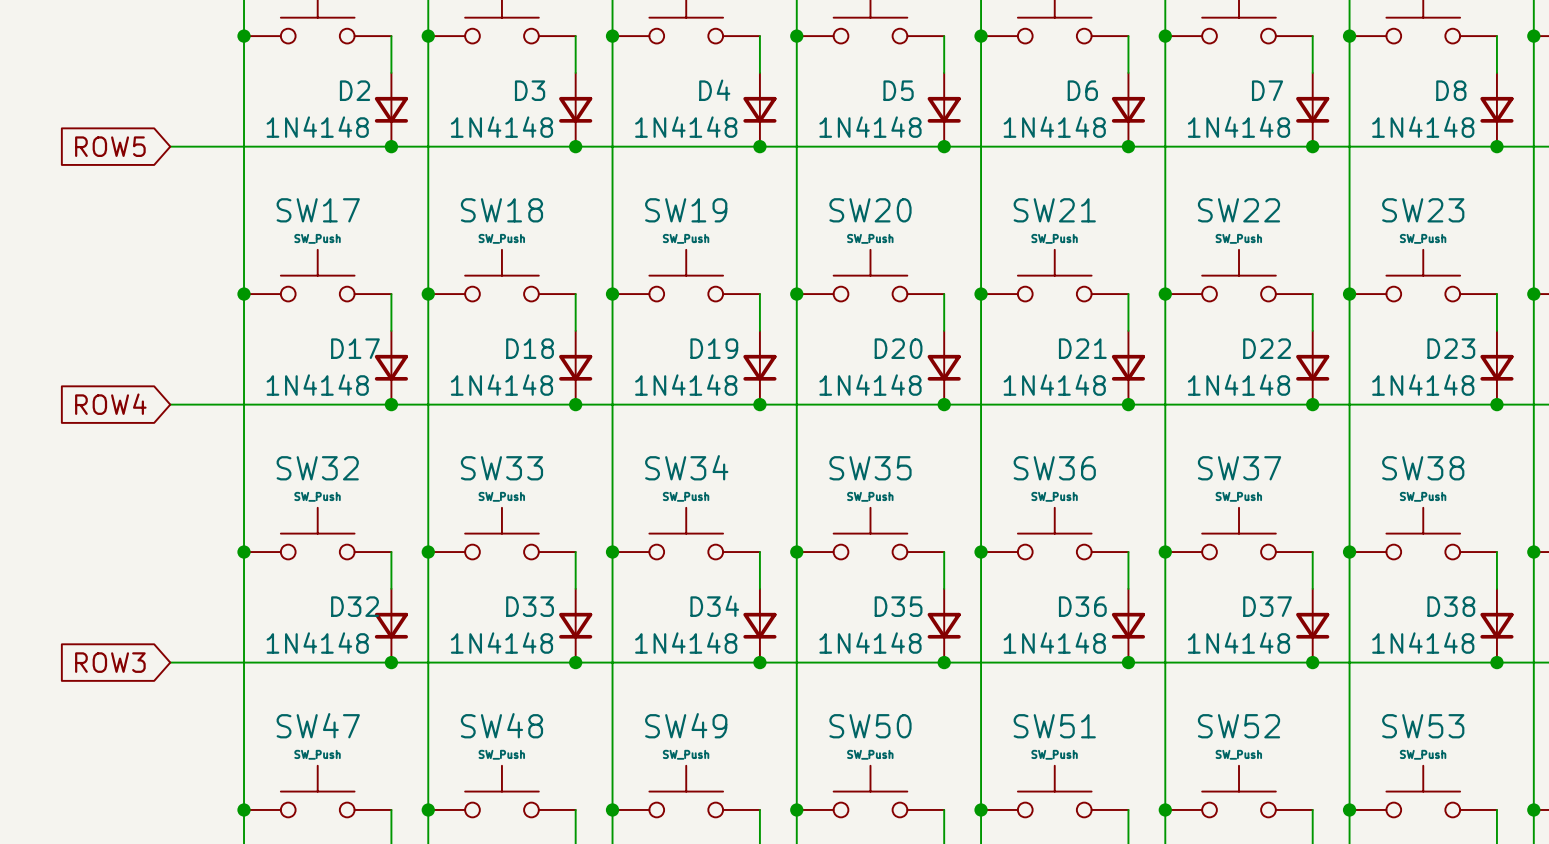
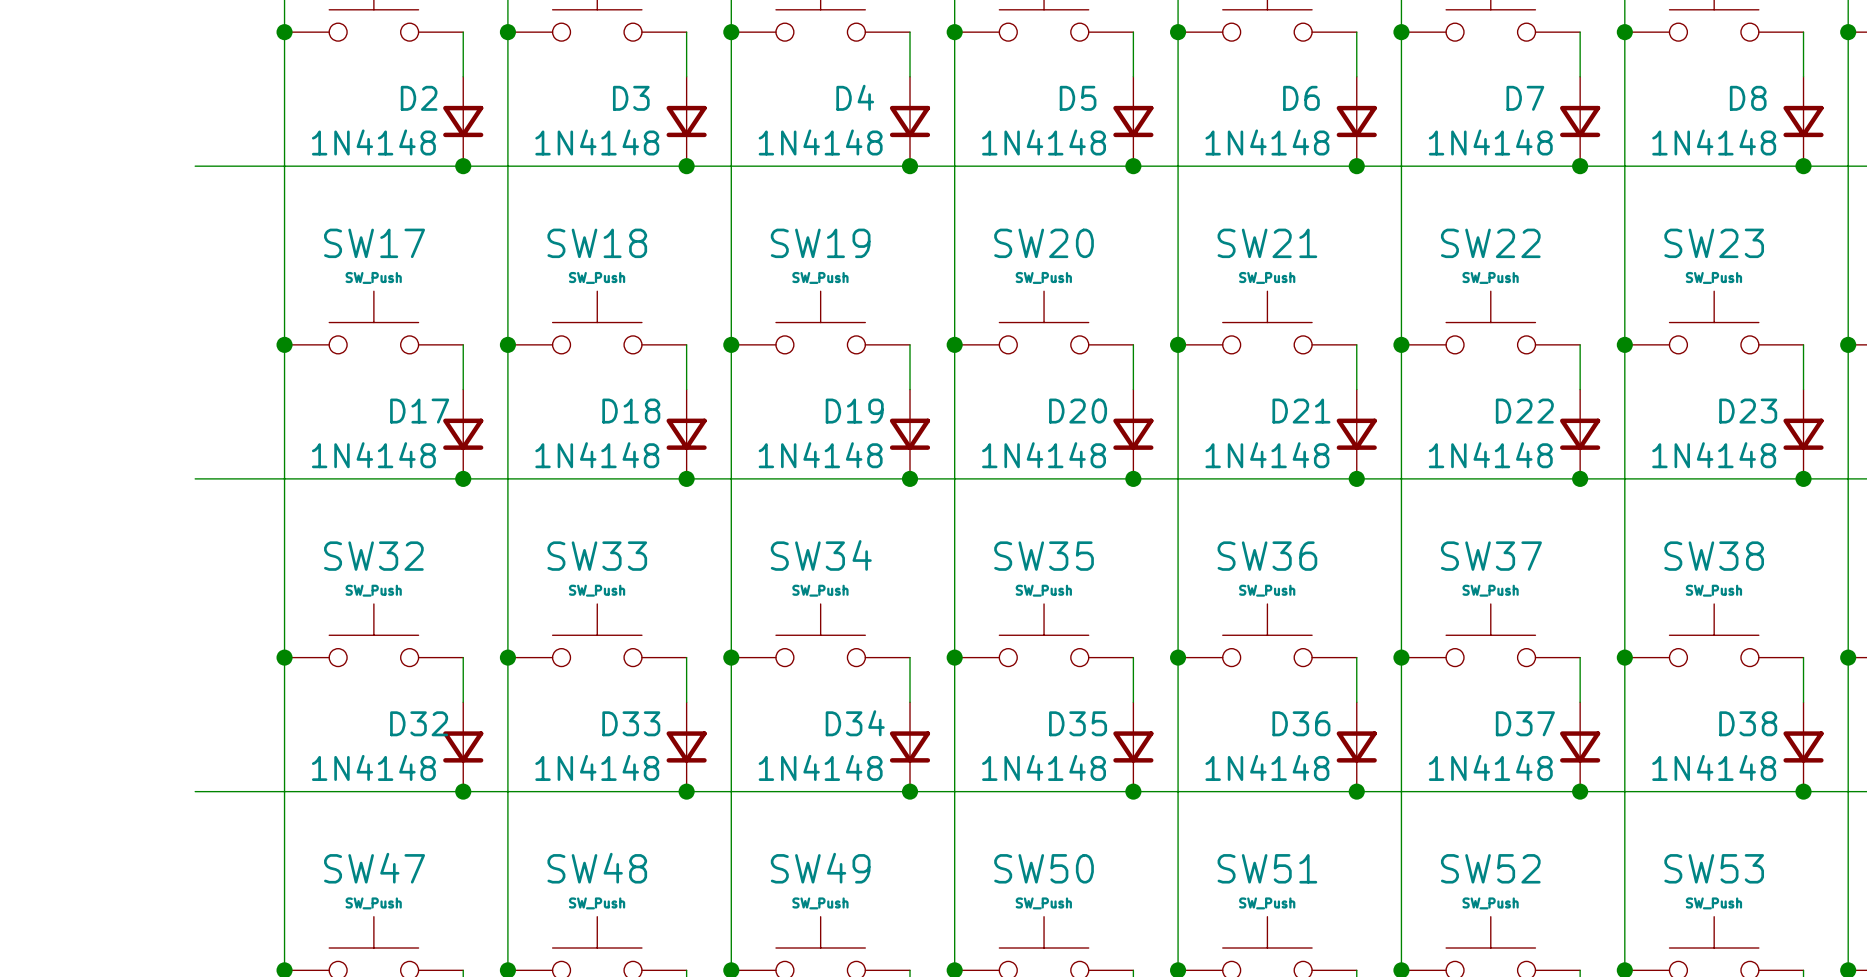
global label: ROW5 (110, 146) -> none
global label: ROW4 (110, 404) -> none
global label: ROW3 (110, 662) -> none

